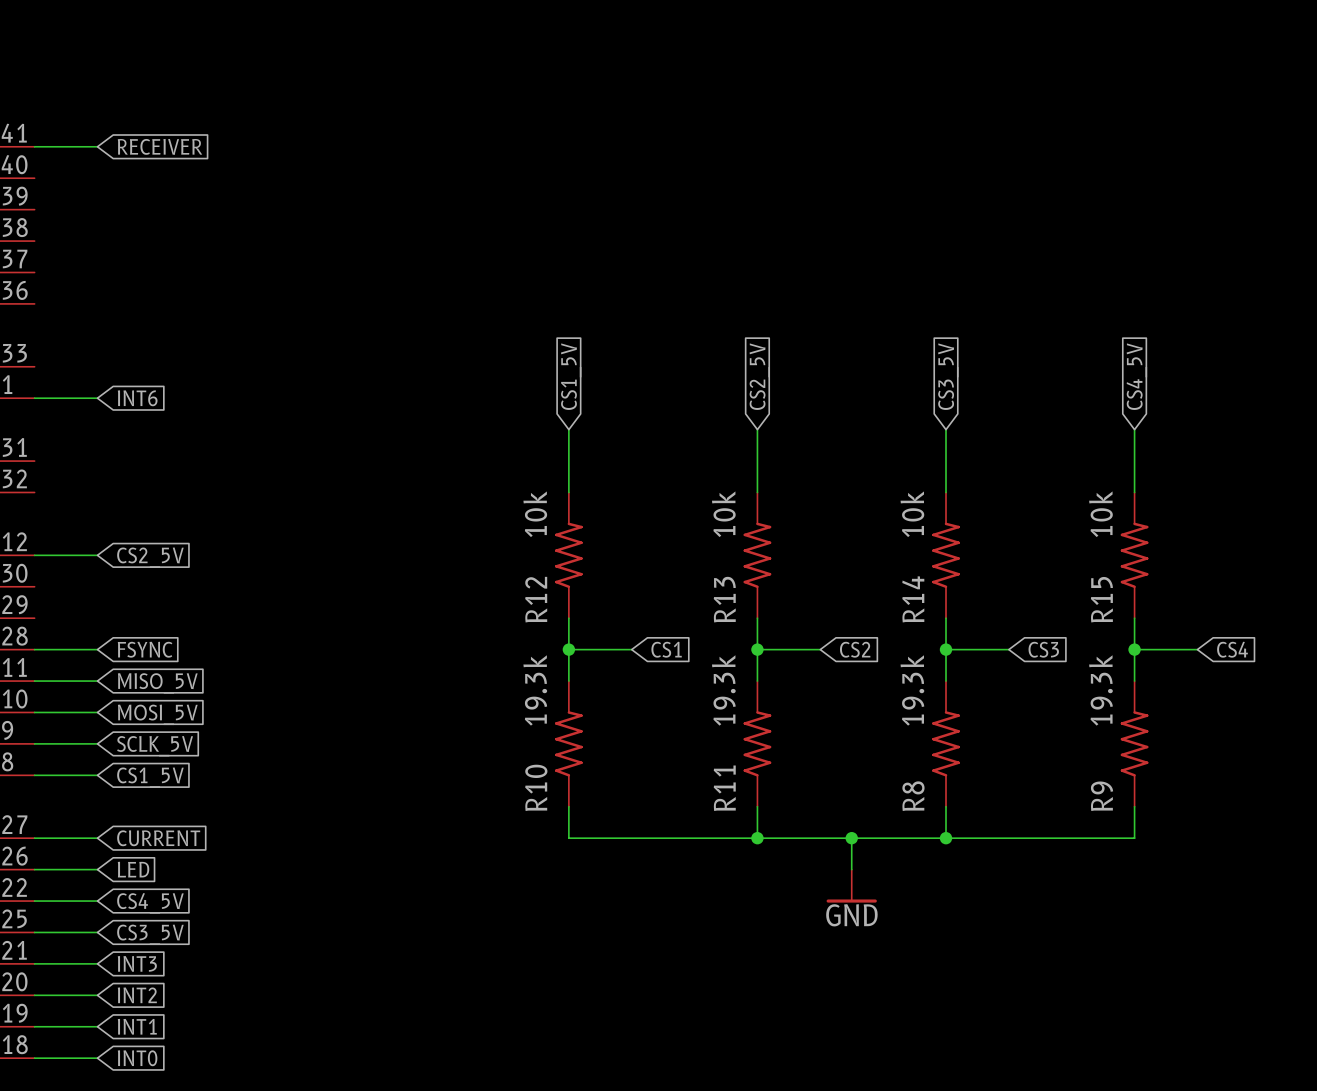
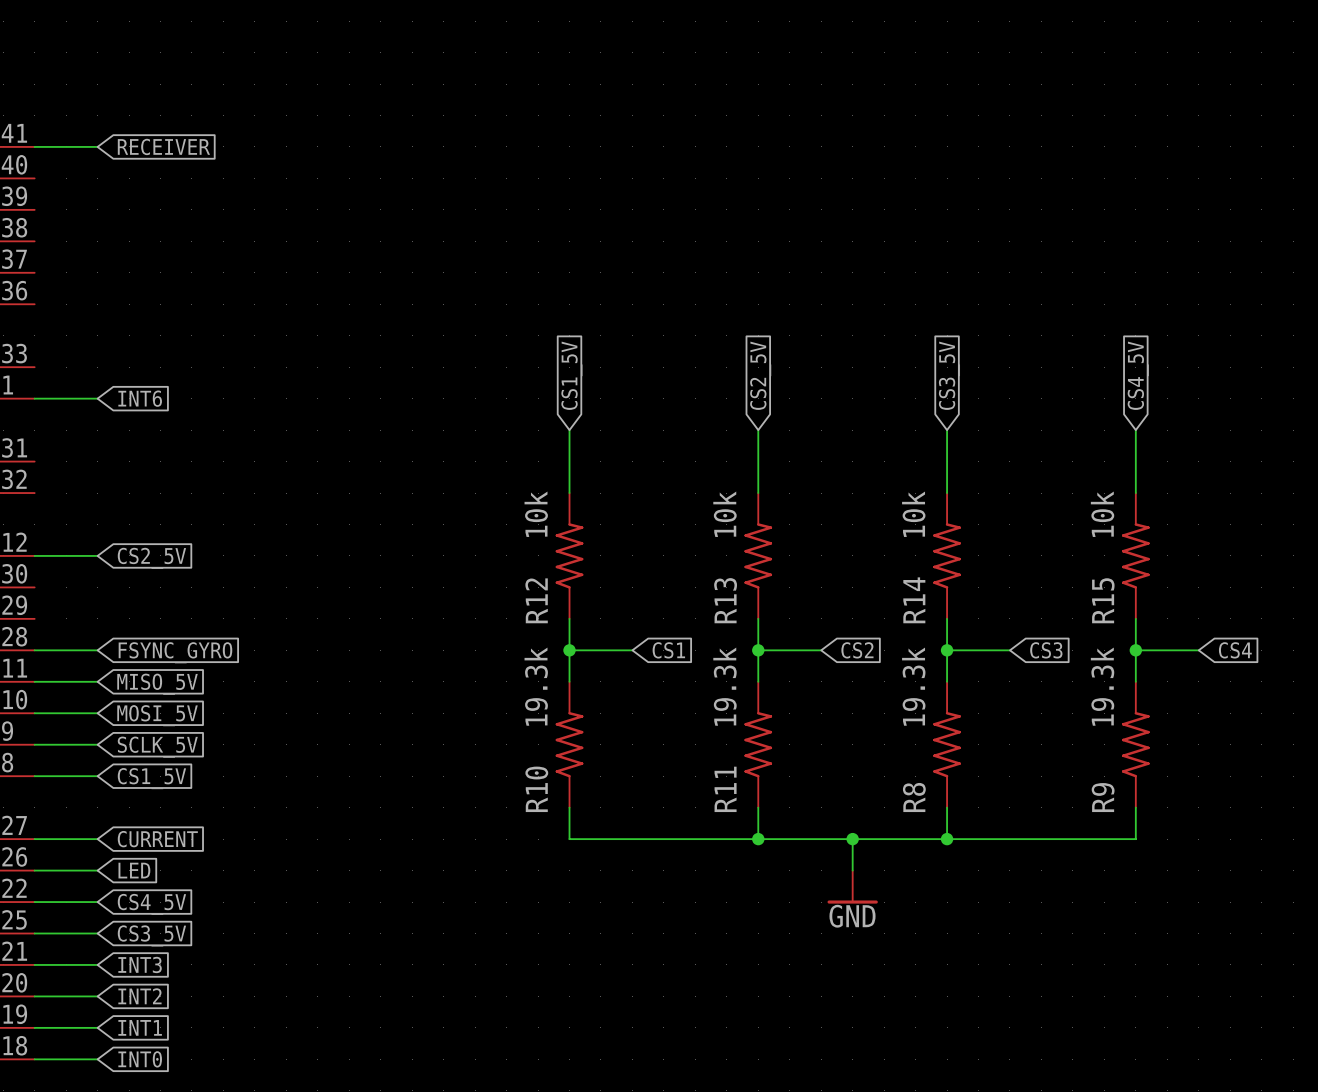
global label: FSYNC (145, 649) -> FSYNC_GYRO (175, 652)

